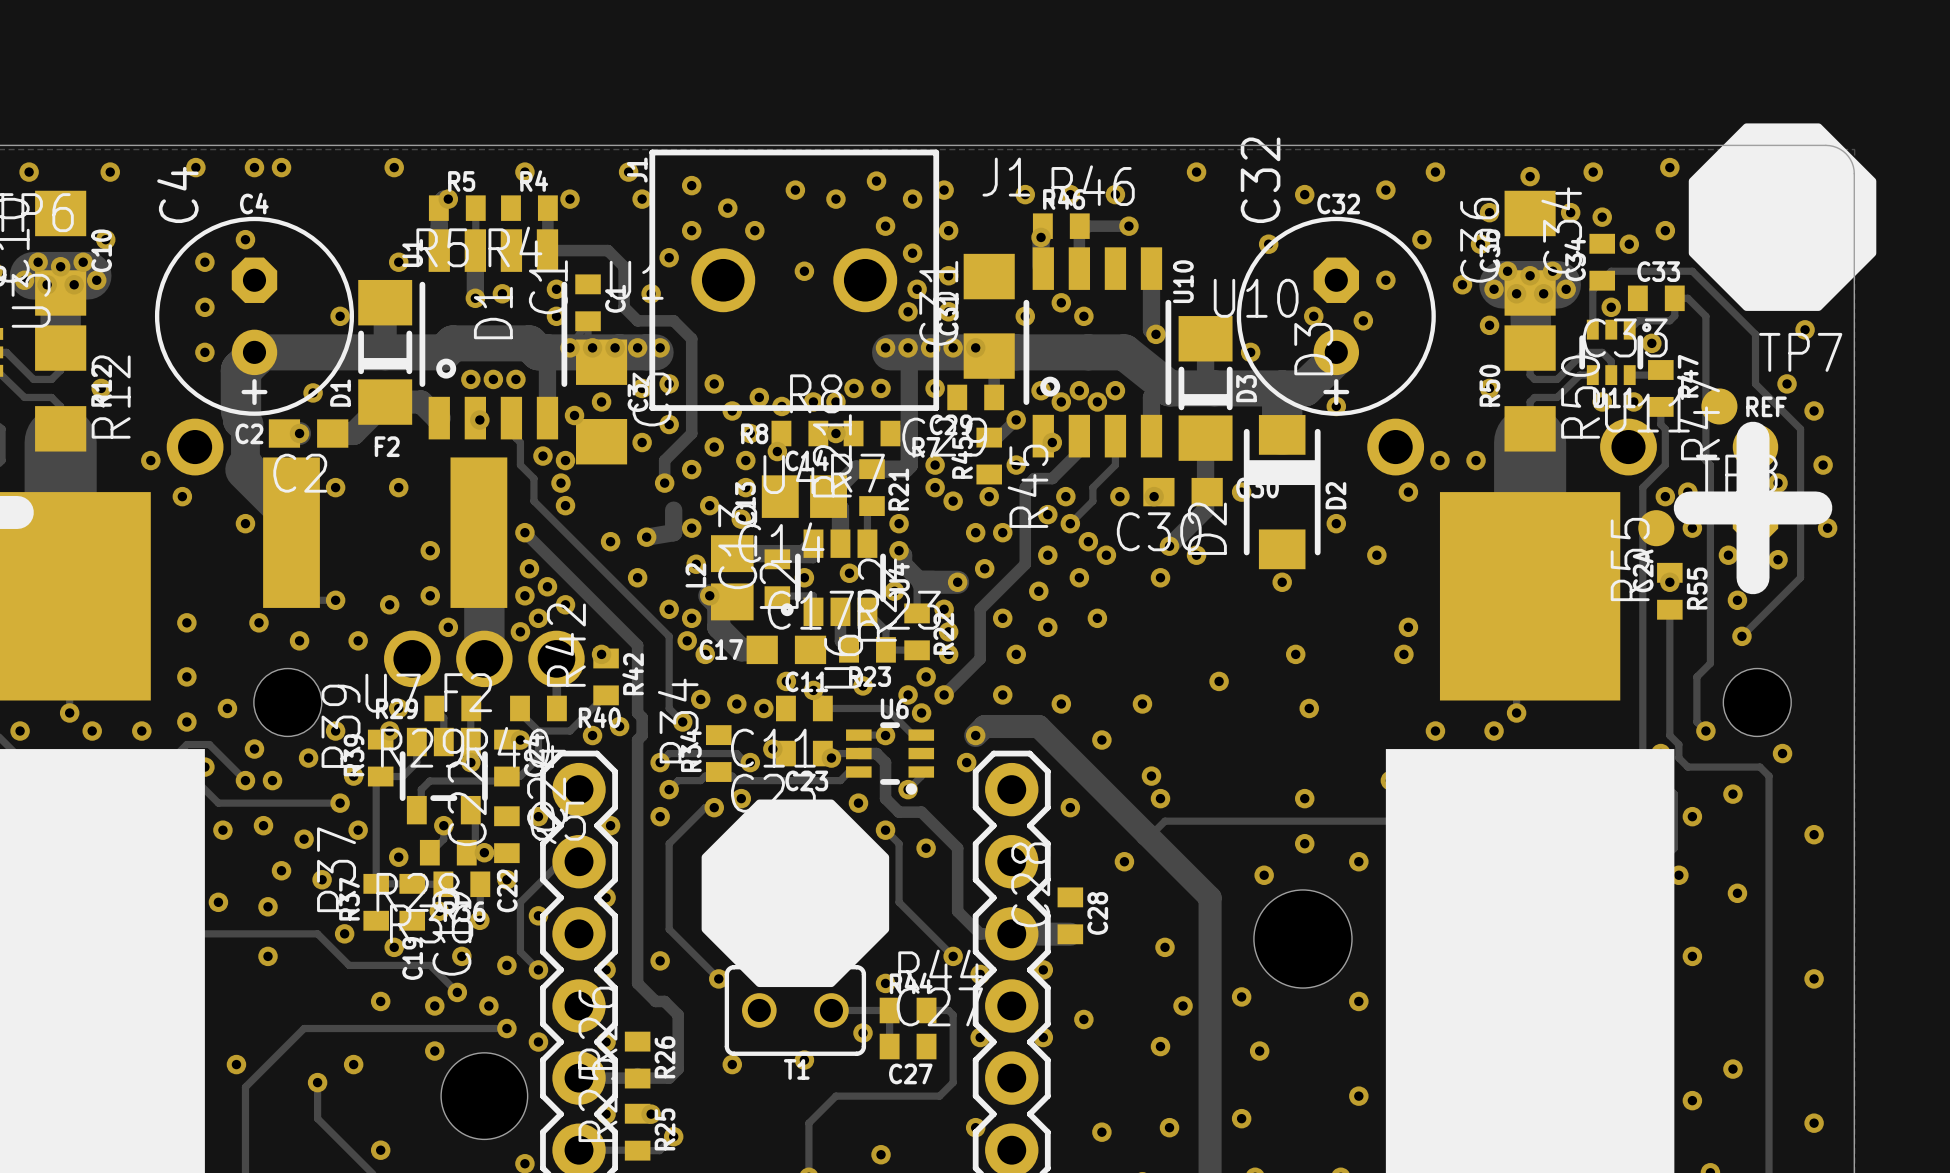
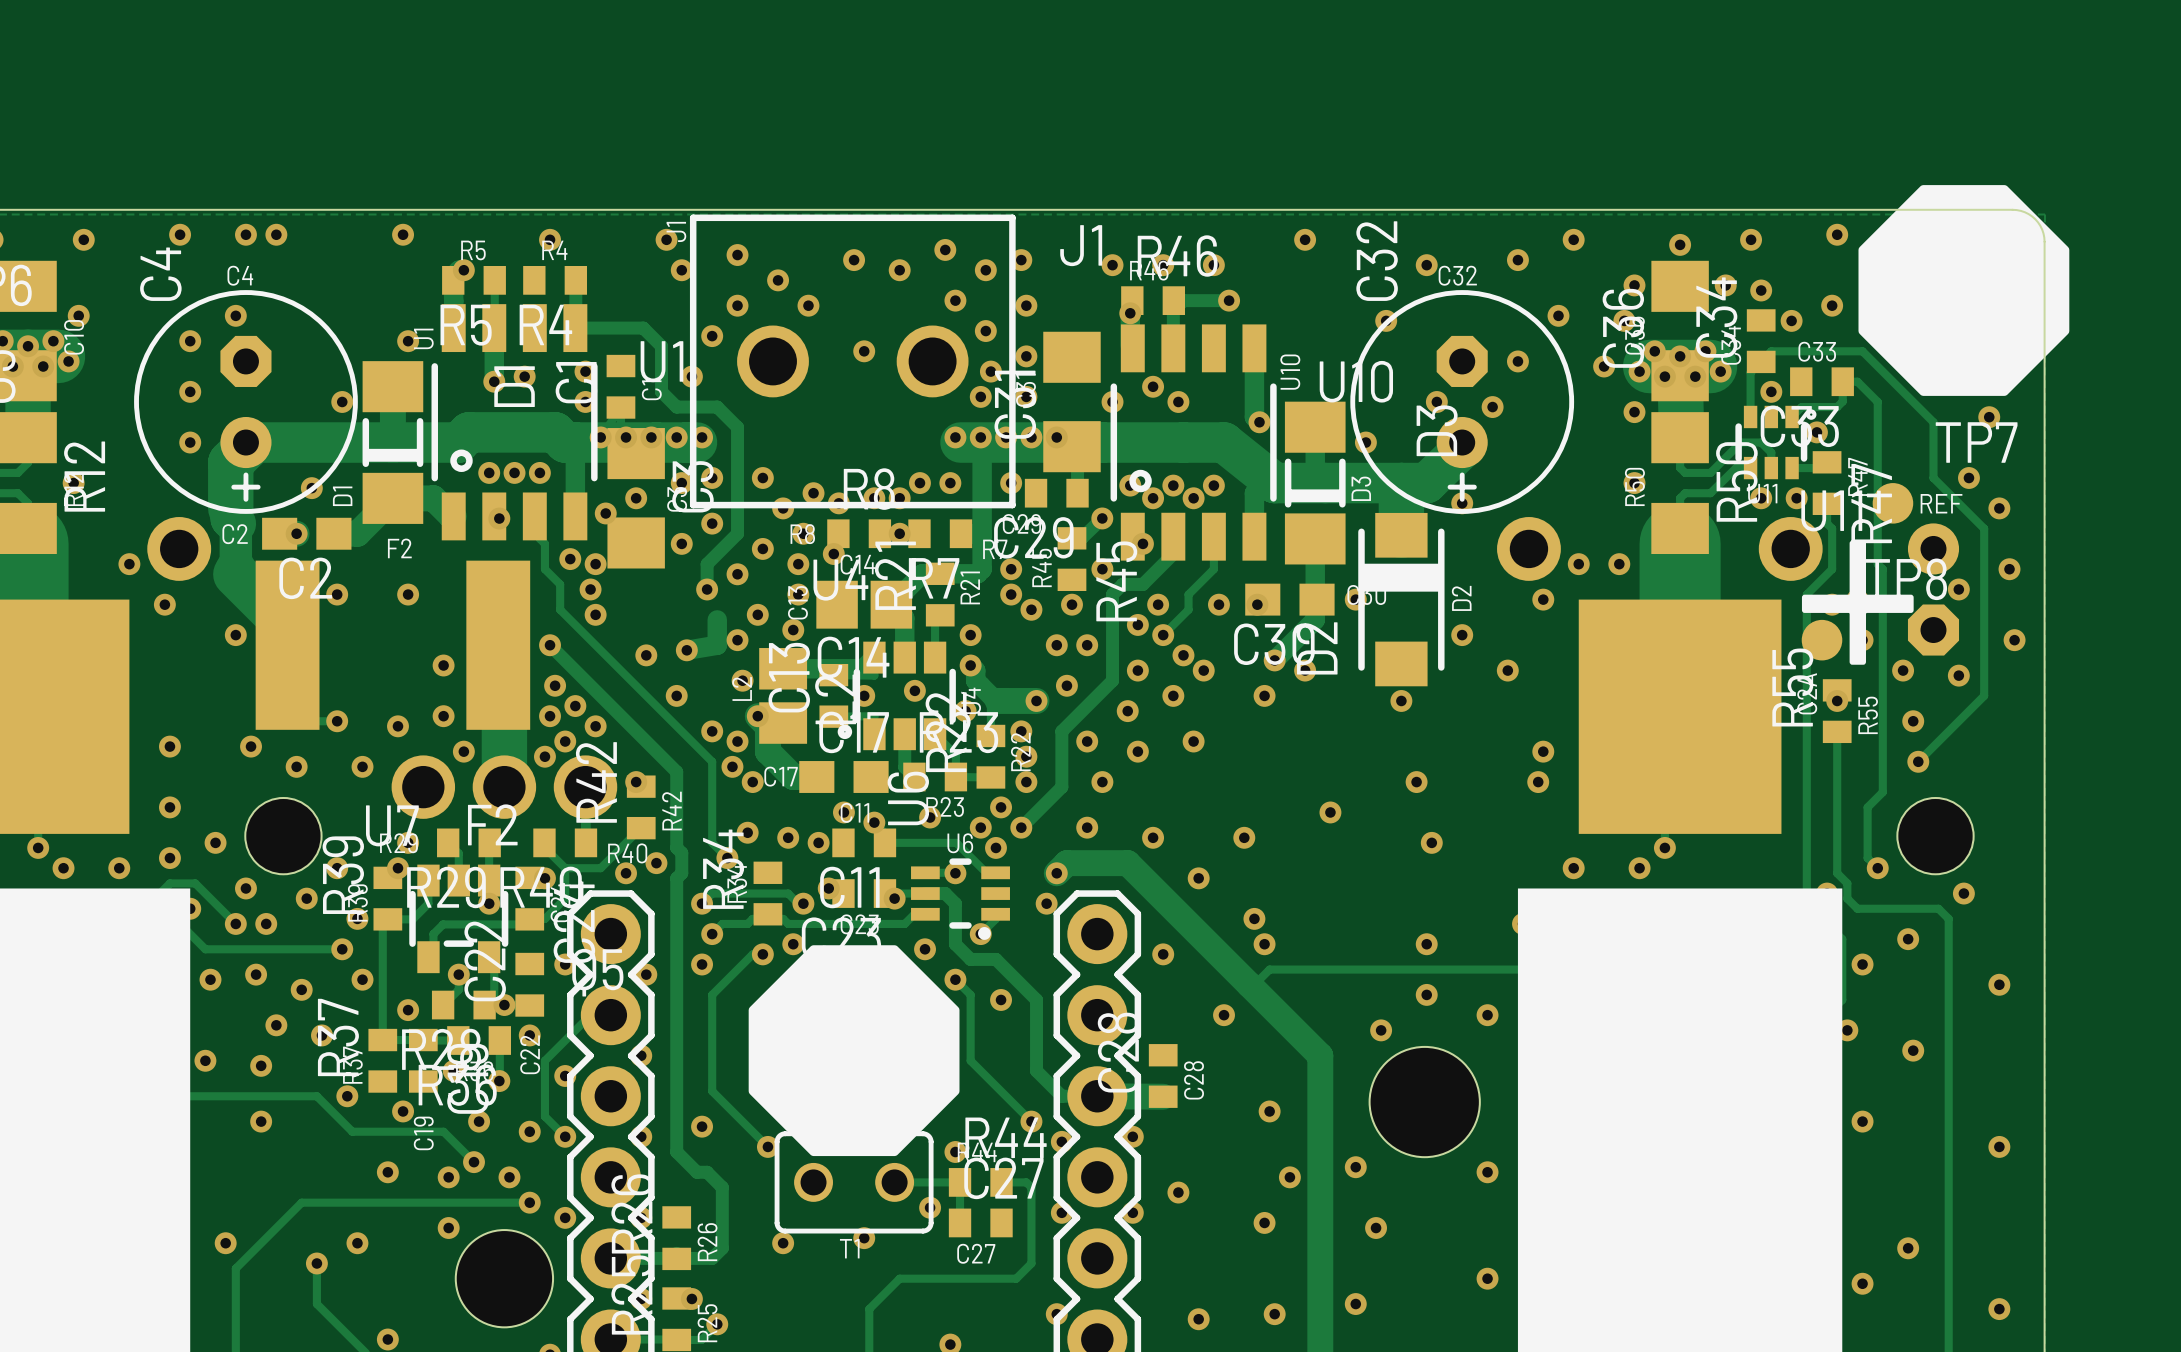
via: (570, 199) -> none

